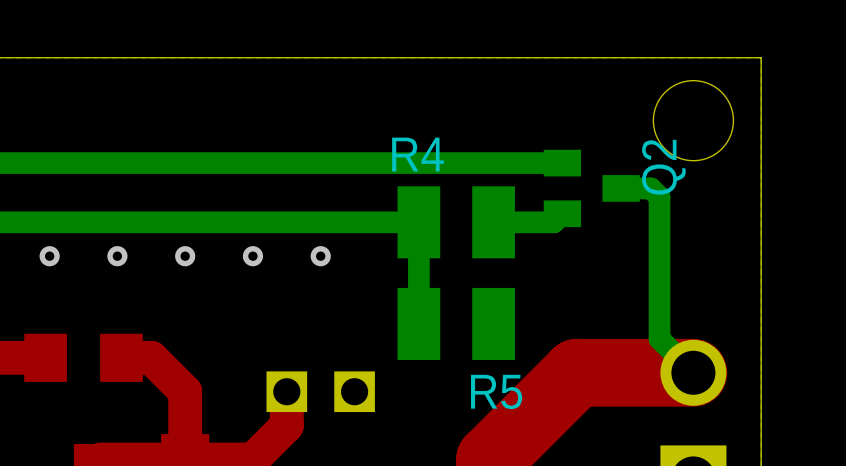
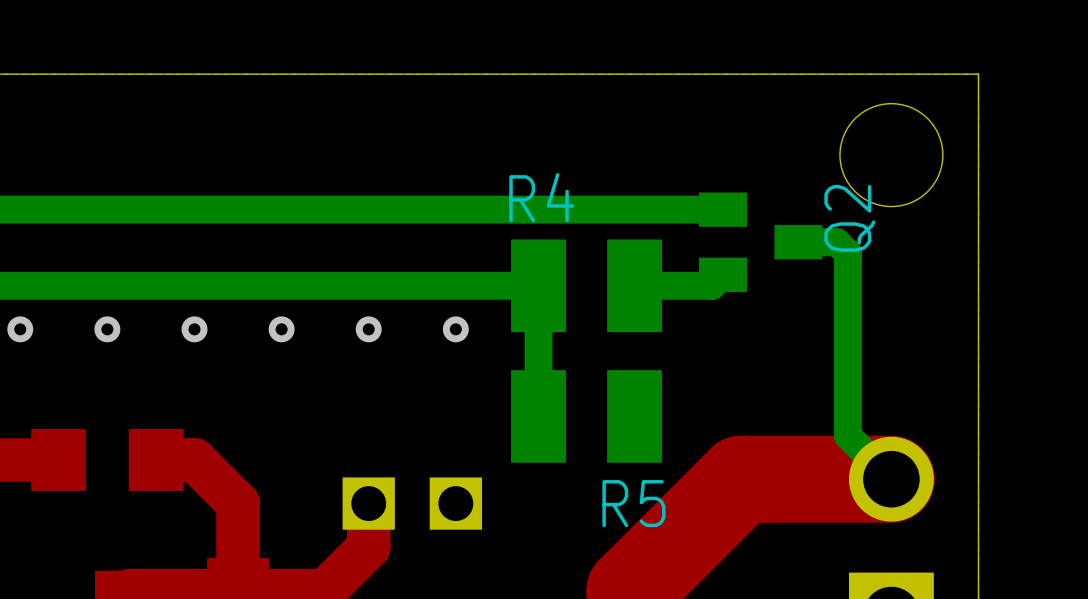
via: none -> (20, 329)
via: (49, 256) -> none
via: none -> (107, 329)
via: (117, 256) -> none
via: none -> (194, 329)
via: (185, 256) -> none
via: none -> (281, 329)
via: (252, 256) -> none
via: none -> (368, 329)
via: (320, 256) -> none
via: none -> (455, 329)

